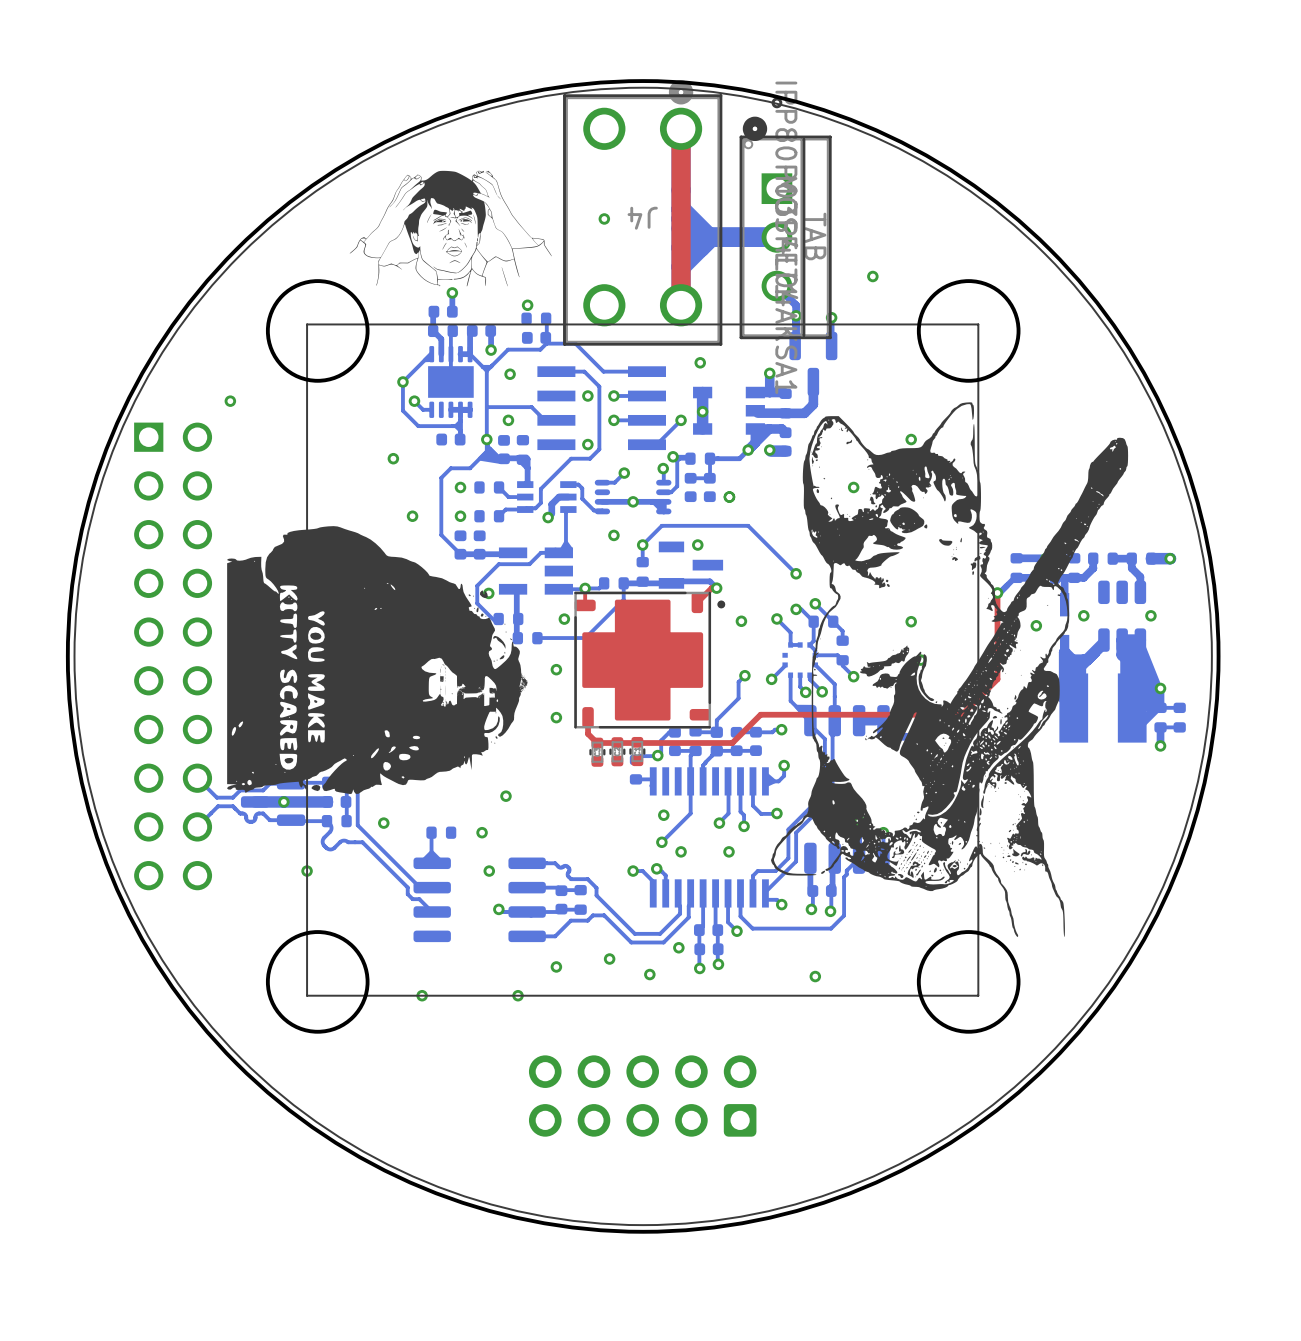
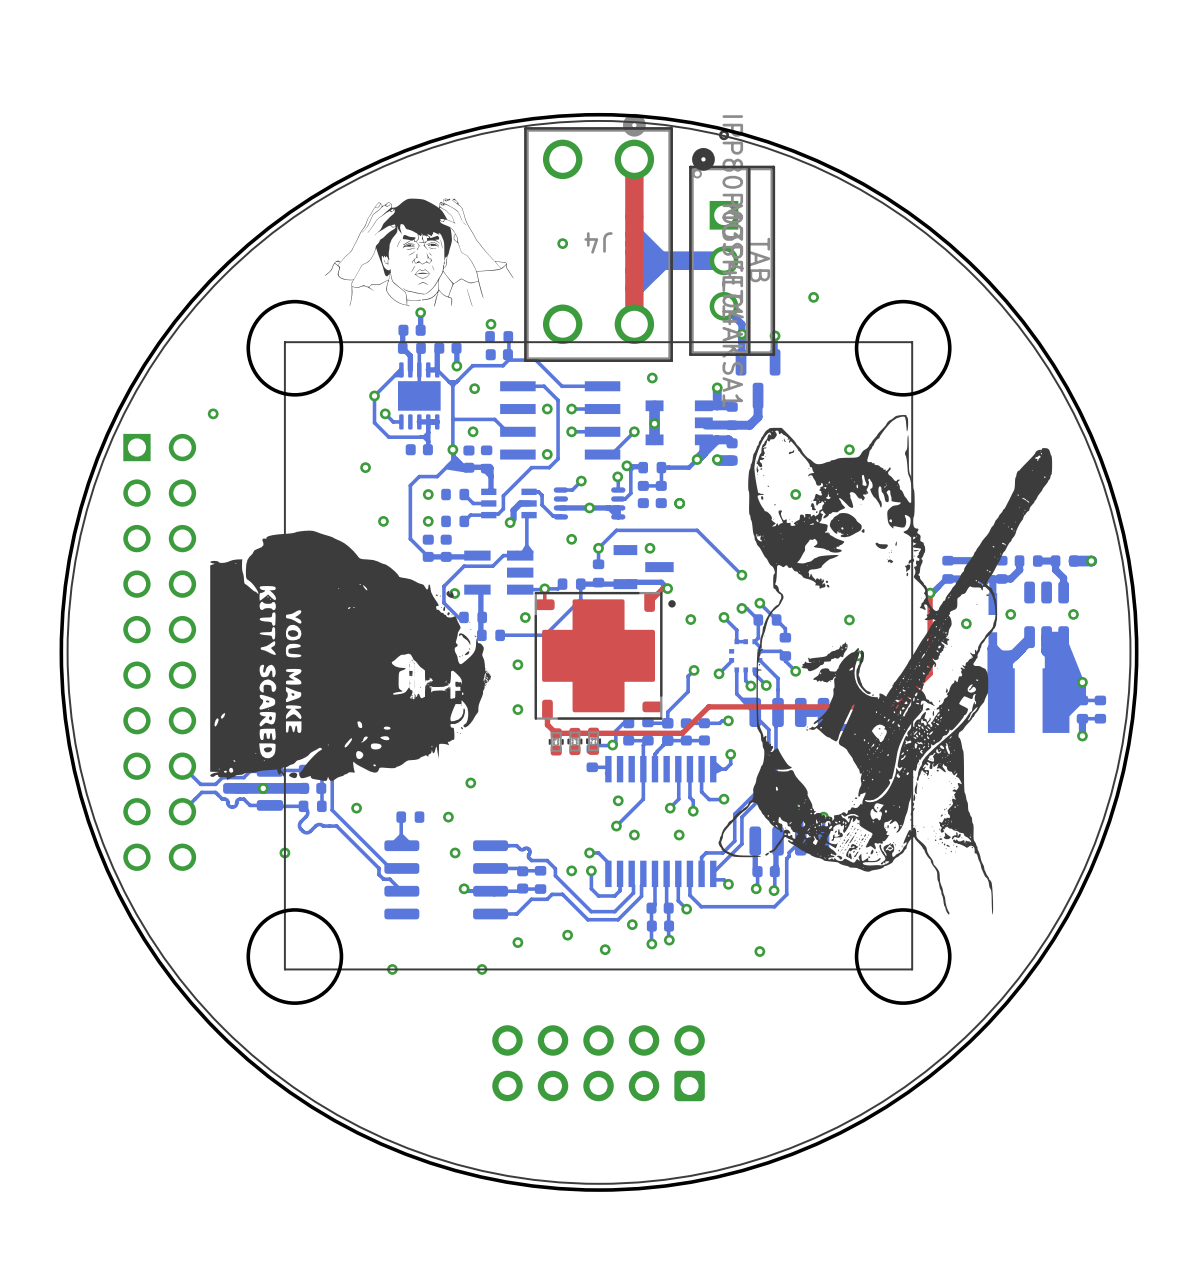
bottom track: (656, 868) (665, 875) (665, 884) -> none
via: (656, 868) -> none
via: none -> (571, 870)
bottom track: none -> (591, 870) (591, 888) (598, 895) (614, 895) (620, 890) (620, 879)
via: none -> (591, 870)

